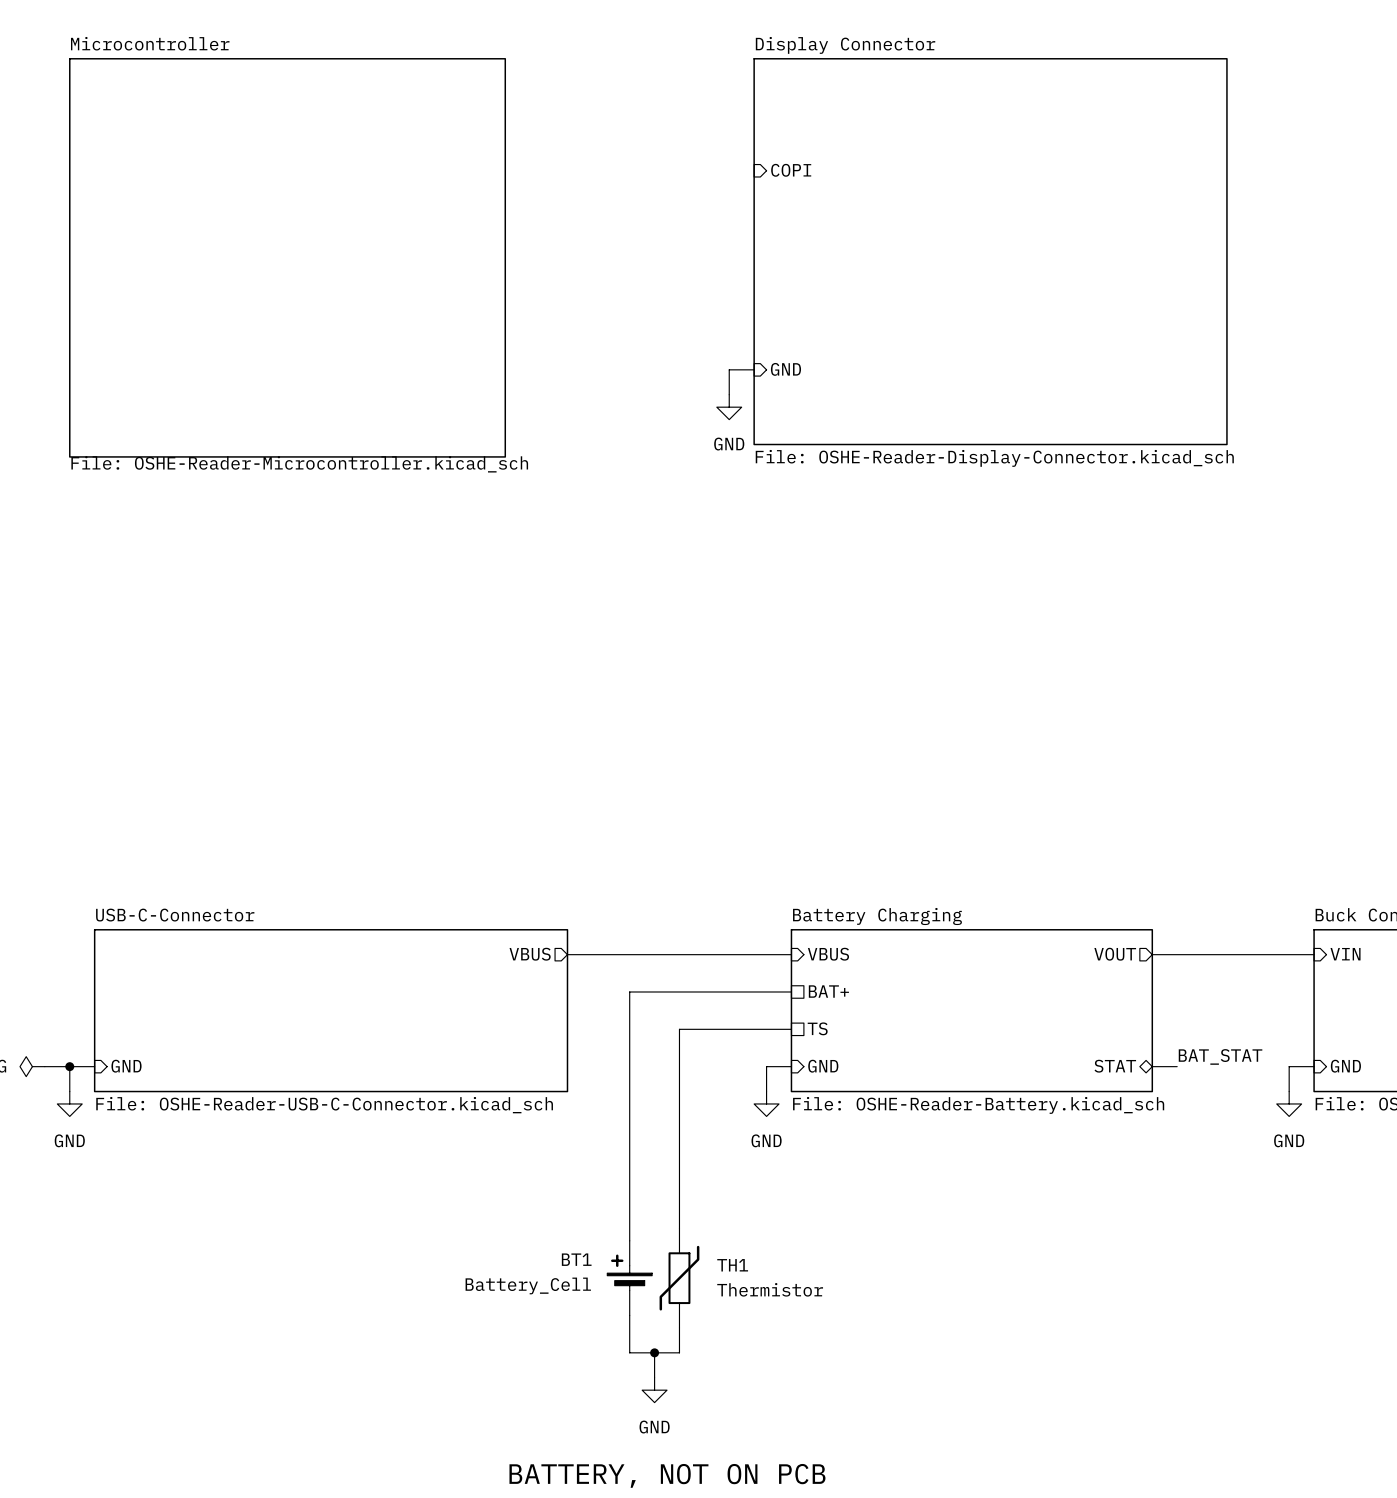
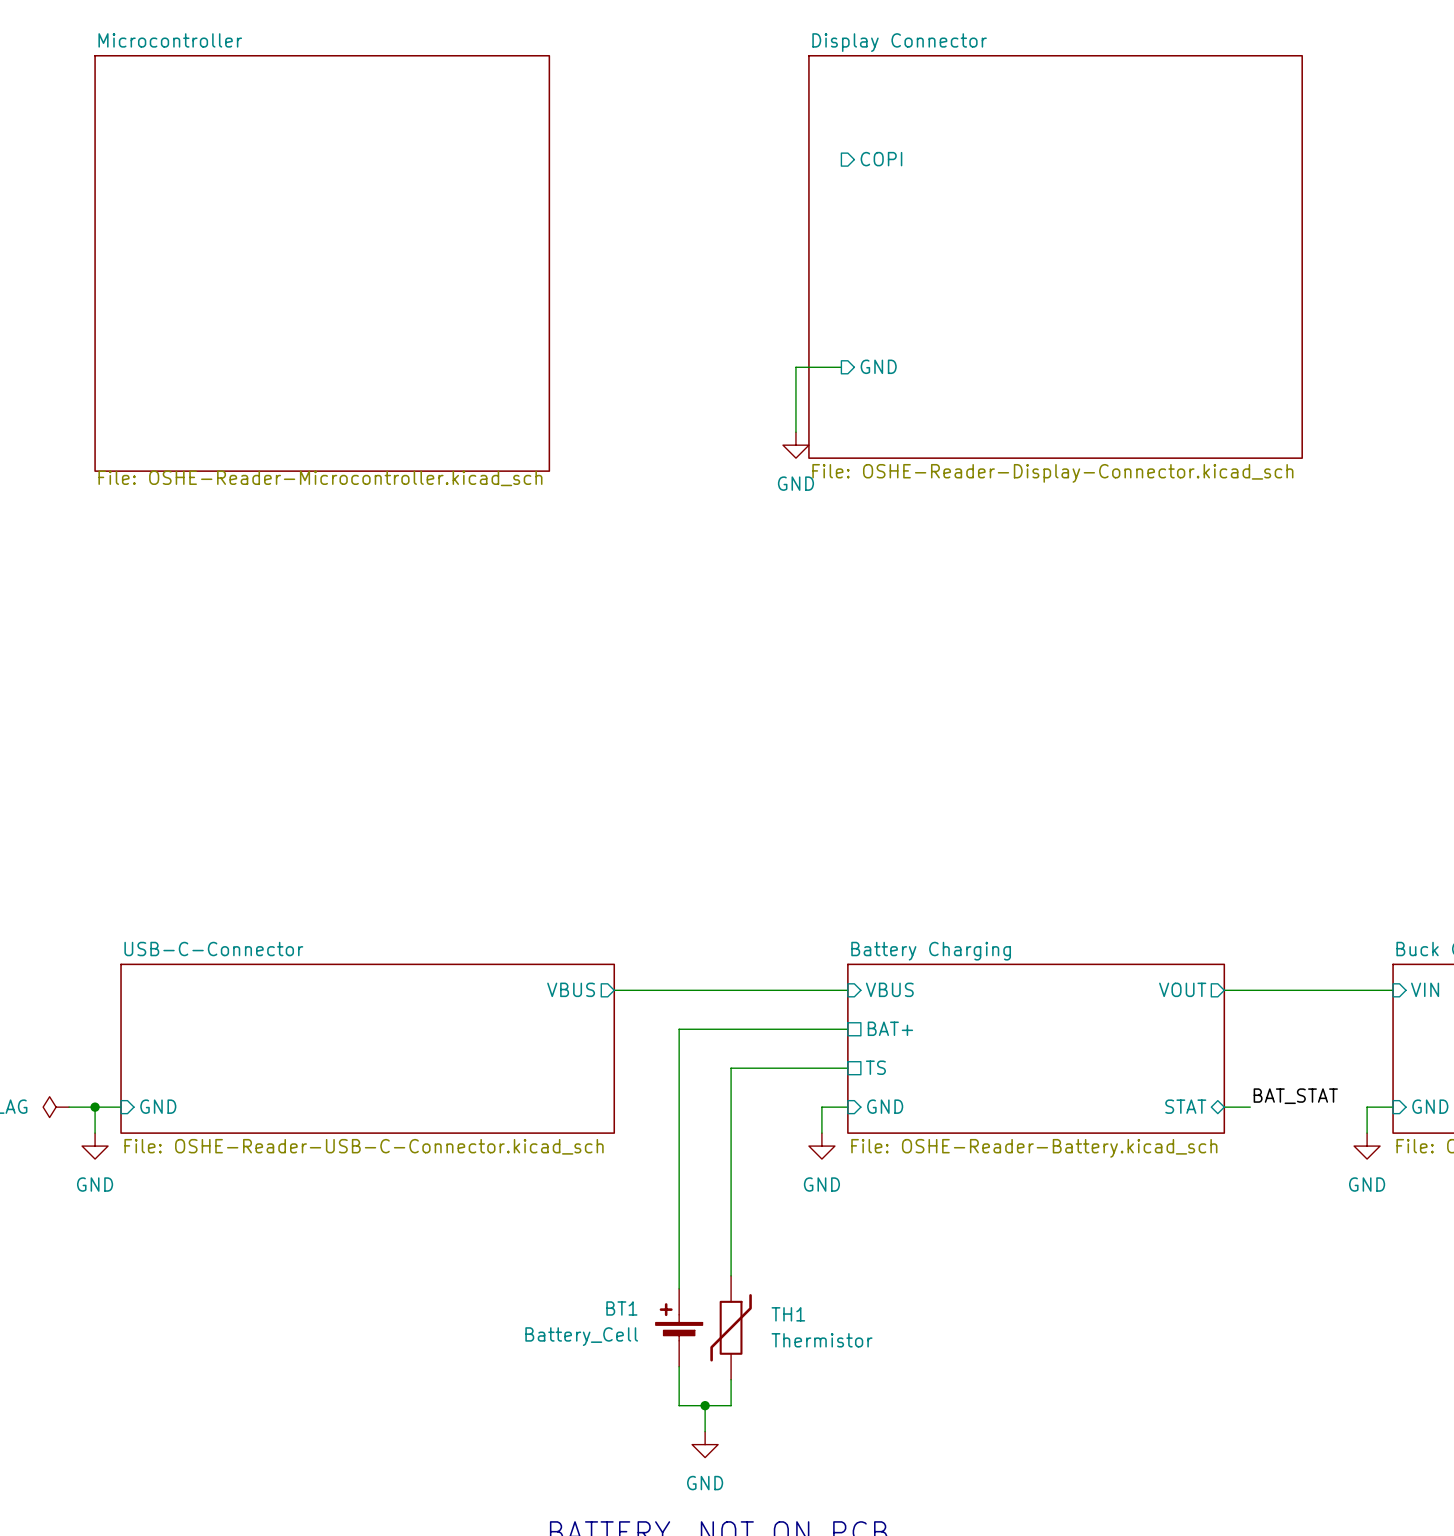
sheet pin position: COPI (791, 170) -> COPI (881, 159)
wire: none -> (841, 367) (795, 367) (795, 432)
wire: (754, 369) (729, 369) (729, 394) -> none
sheet pin position: GND (785, 369) -> GND (878, 366)
power symbol position: GND (729, 407) -> GND (795, 445)

